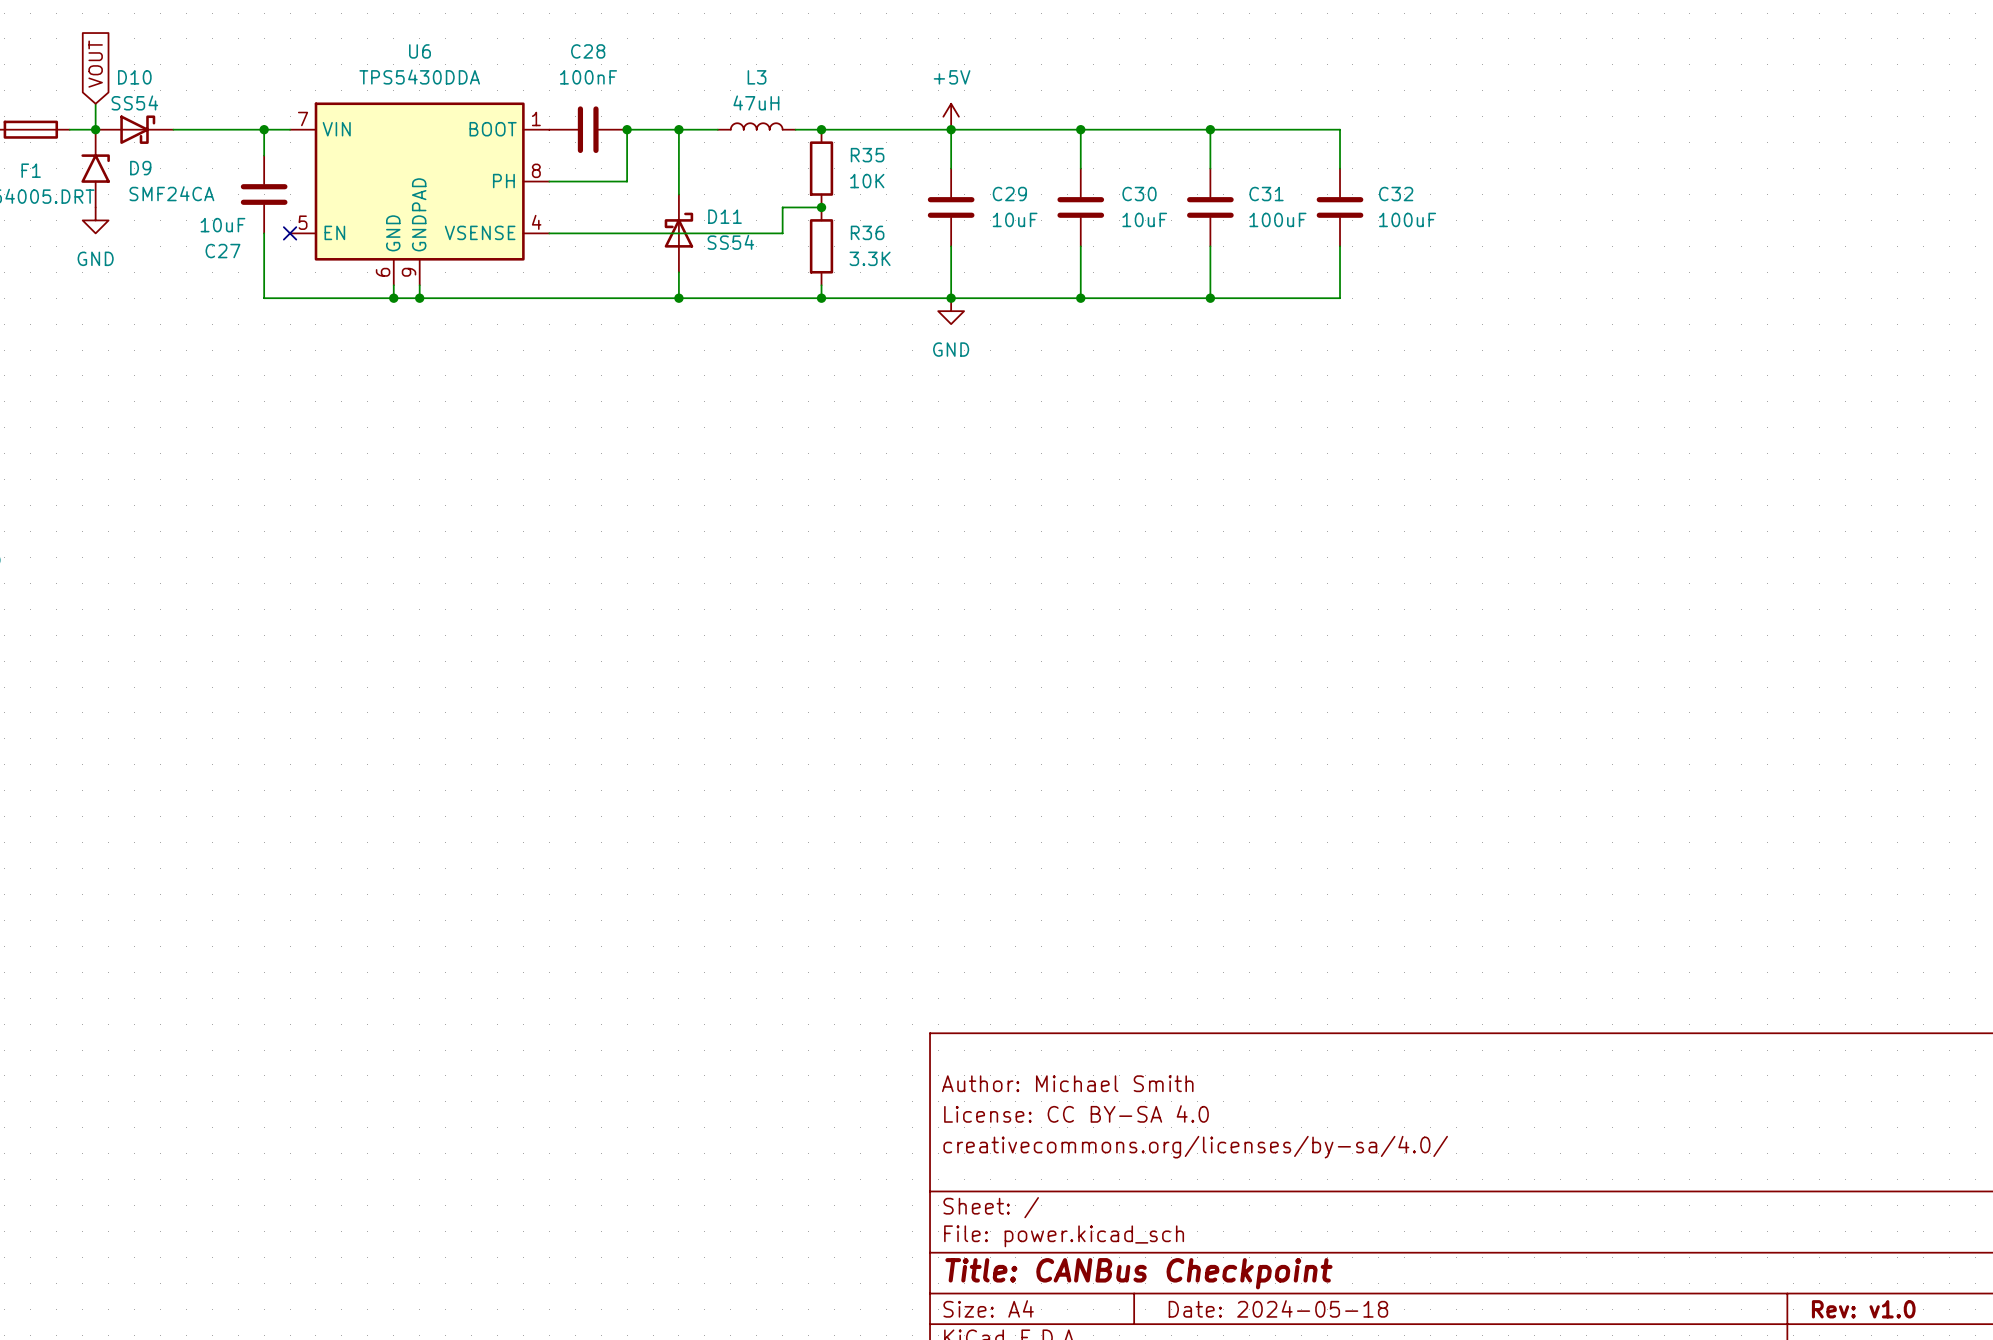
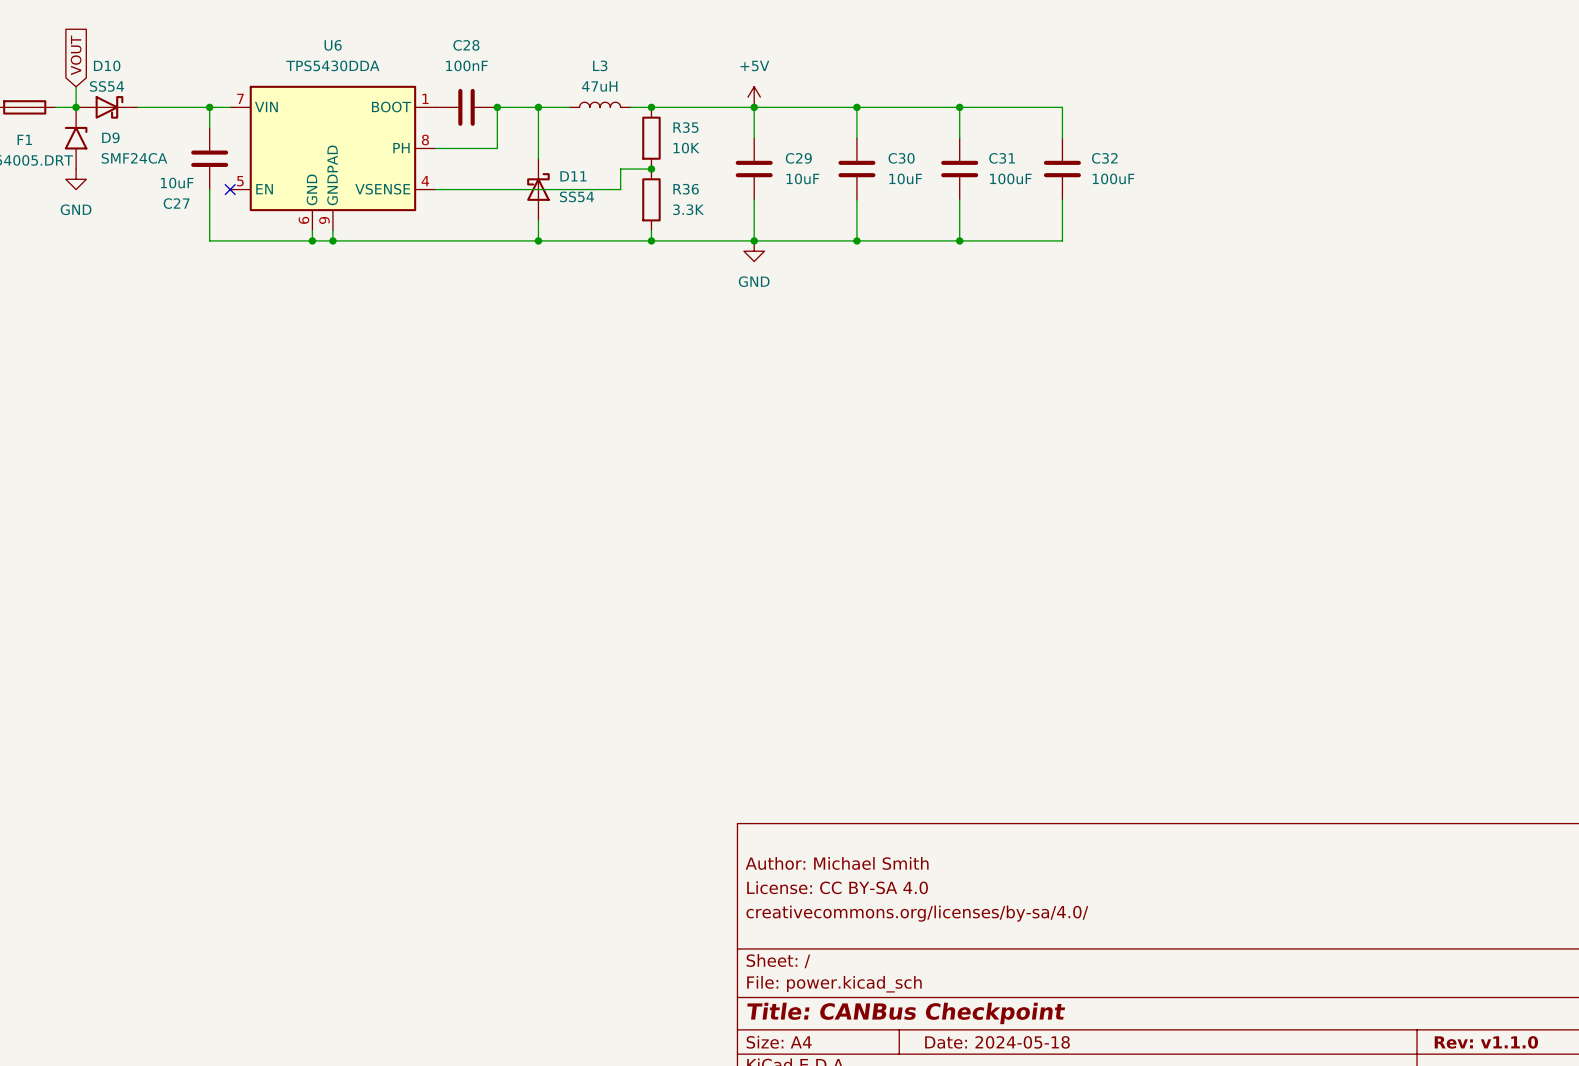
title block: Rev: v1.0 (1863, 1309) -> Rev: v1.1.0 (1486, 1042)

